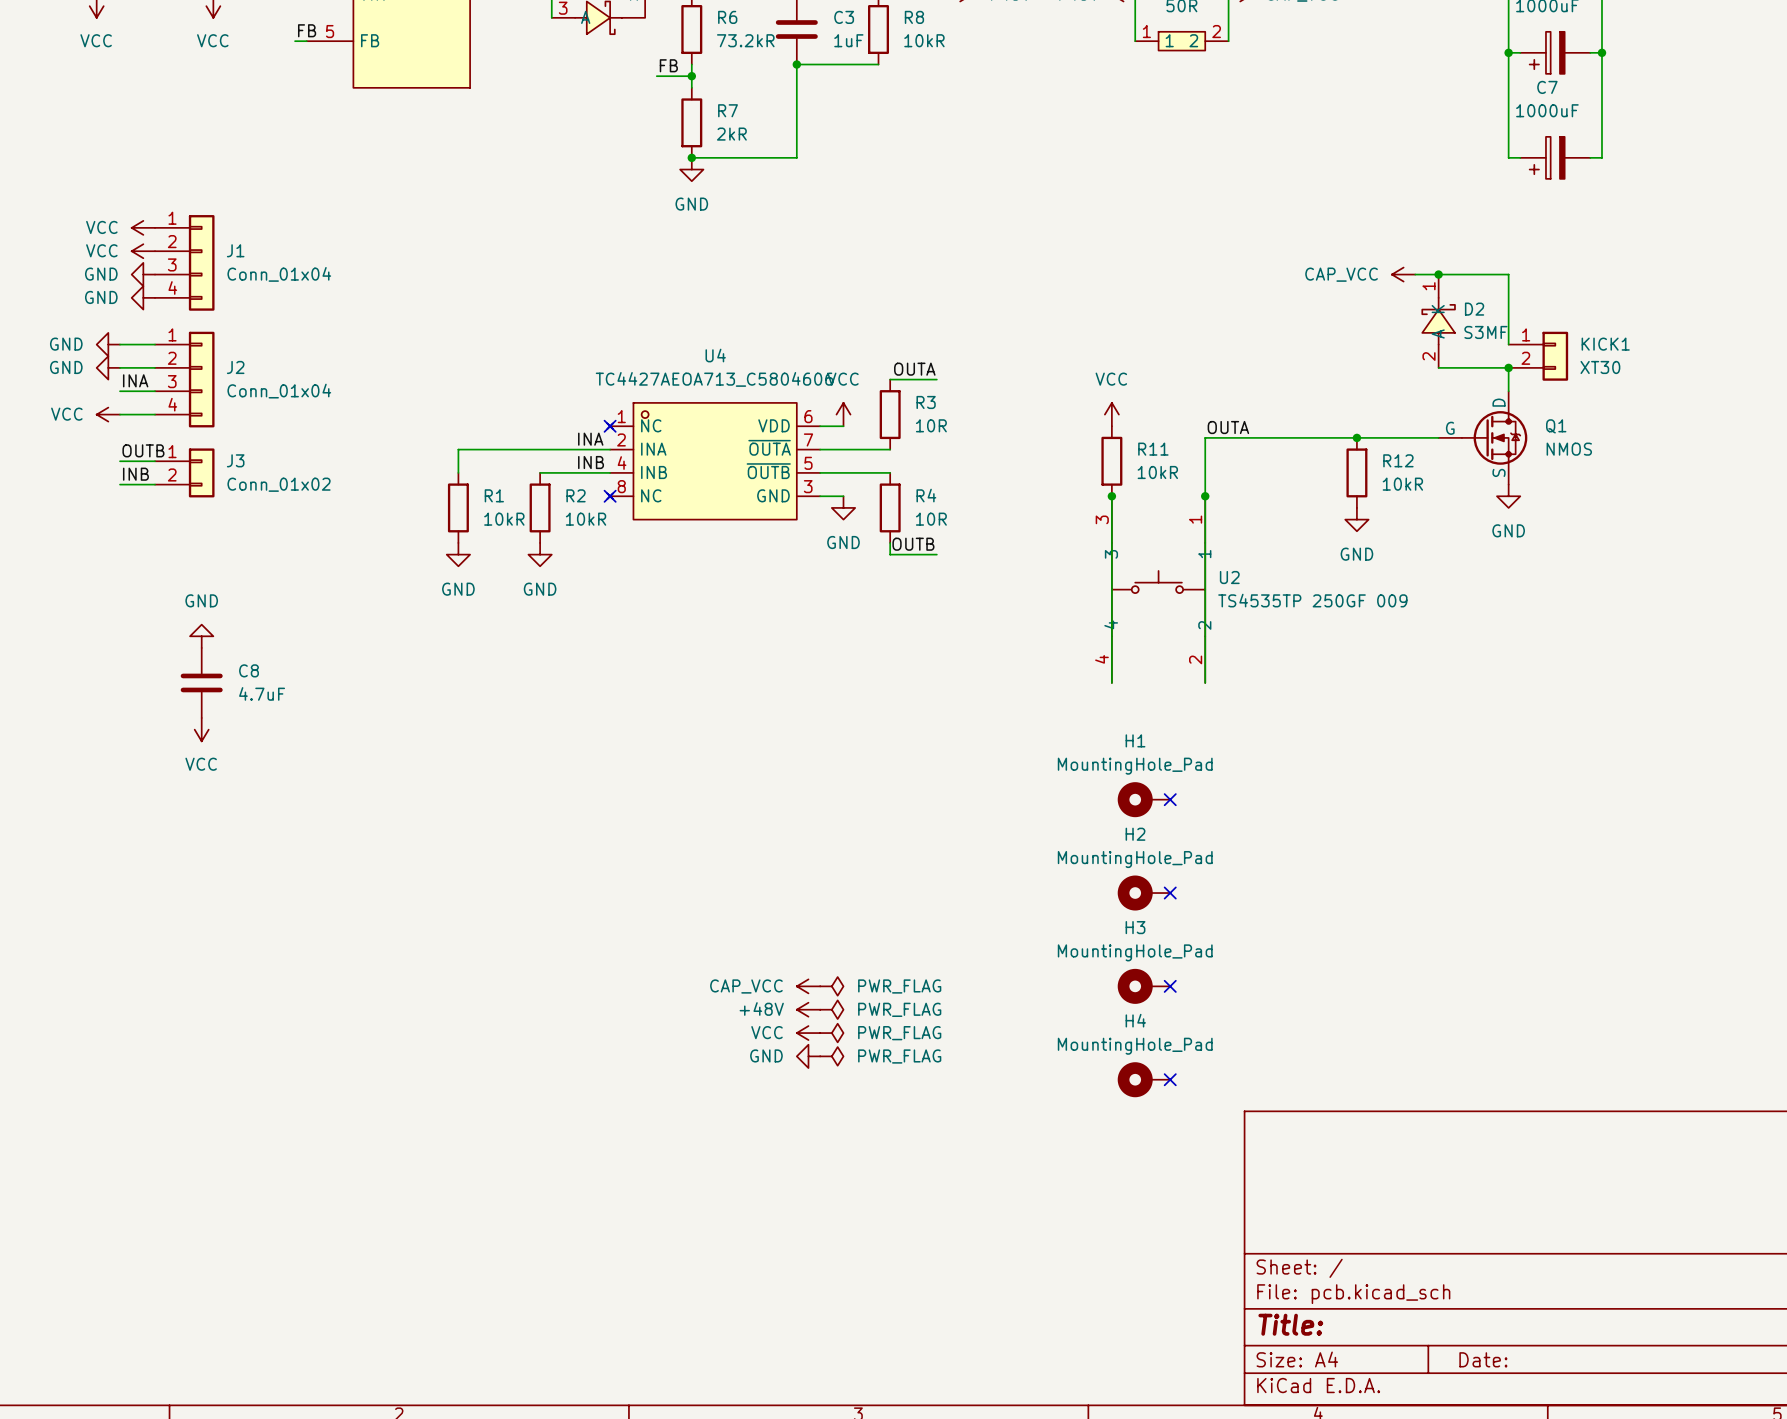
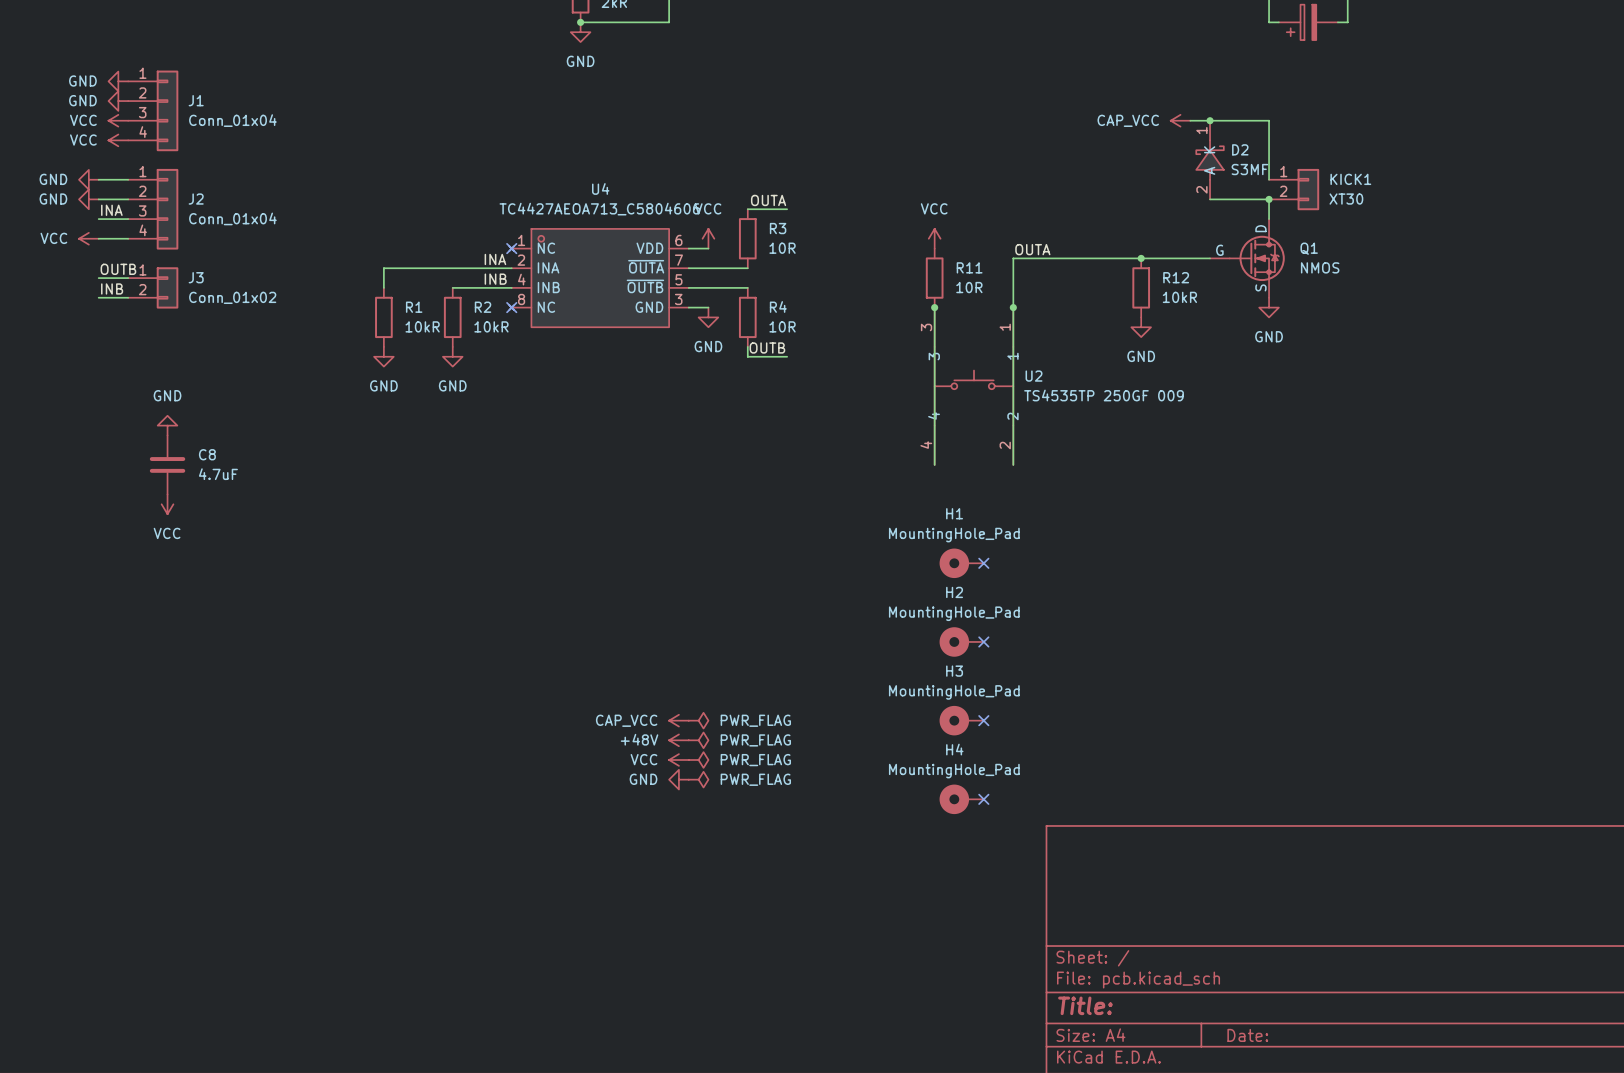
power symbol: VCC (143, 227) -> GND (118, 81)
power symbol: VCC (143, 251) -> GND (118, 101)
power symbol: GND (143, 274) -> VCC (118, 120)
power symbol: GND (143, 297) -> VCC (118, 140)
R11 value: 10kR (1157, 472) -> 10R (969, 287)

